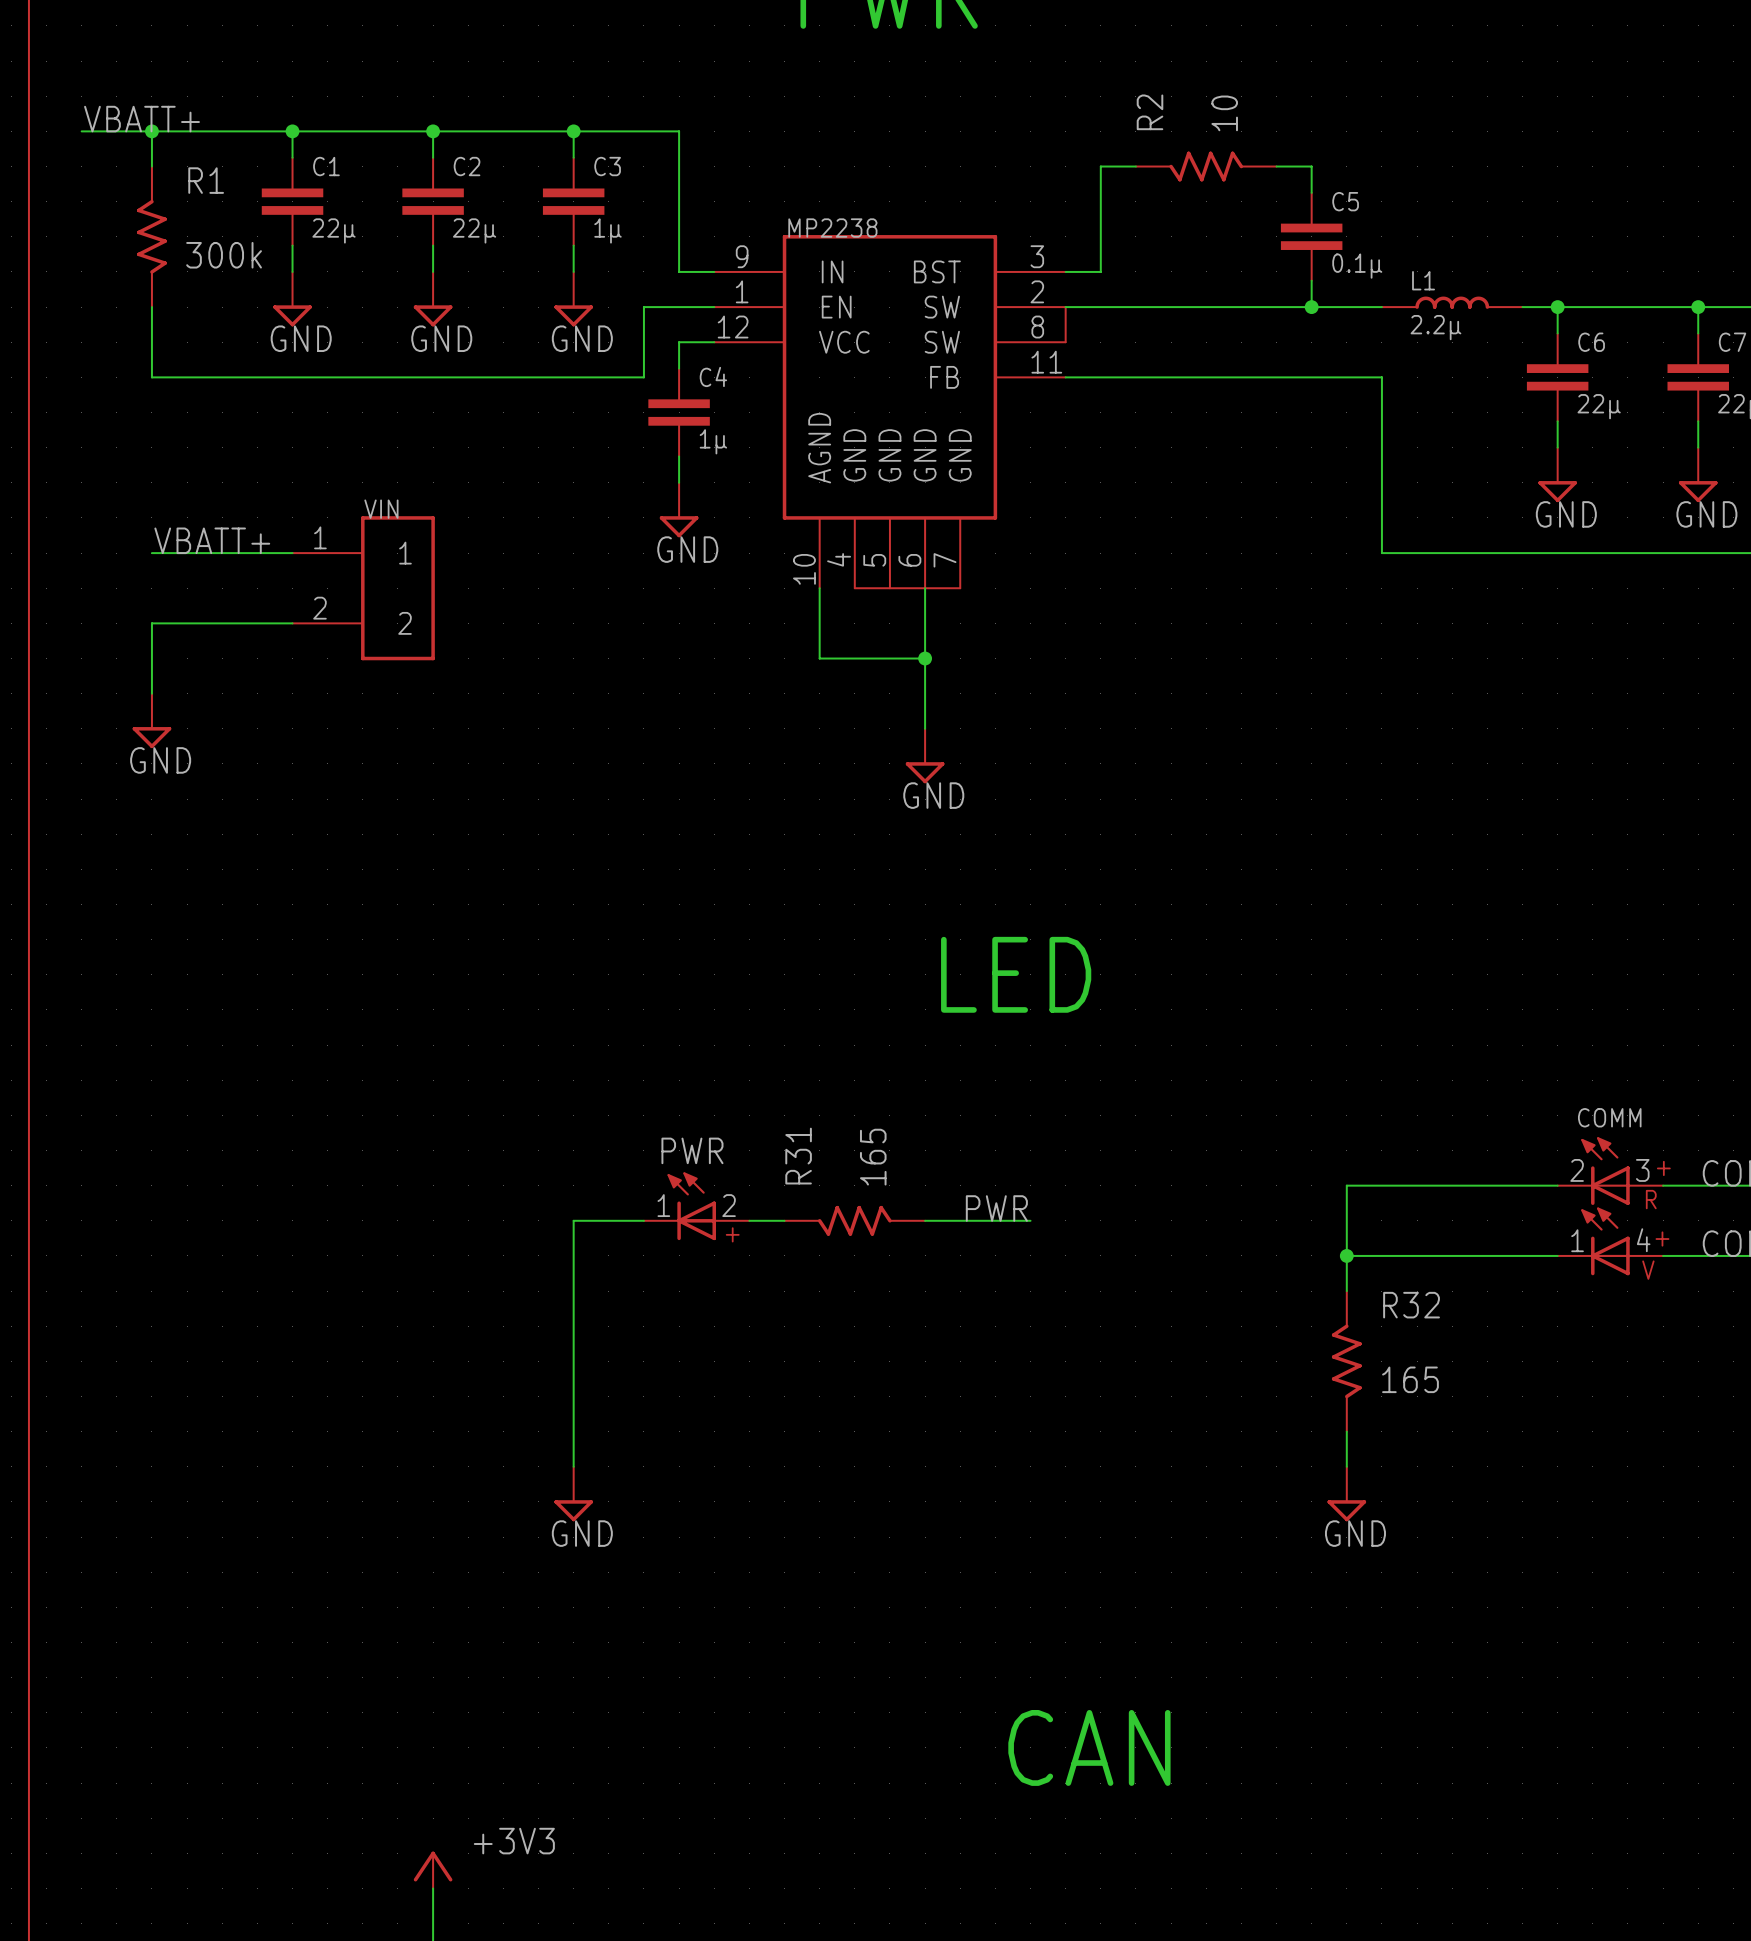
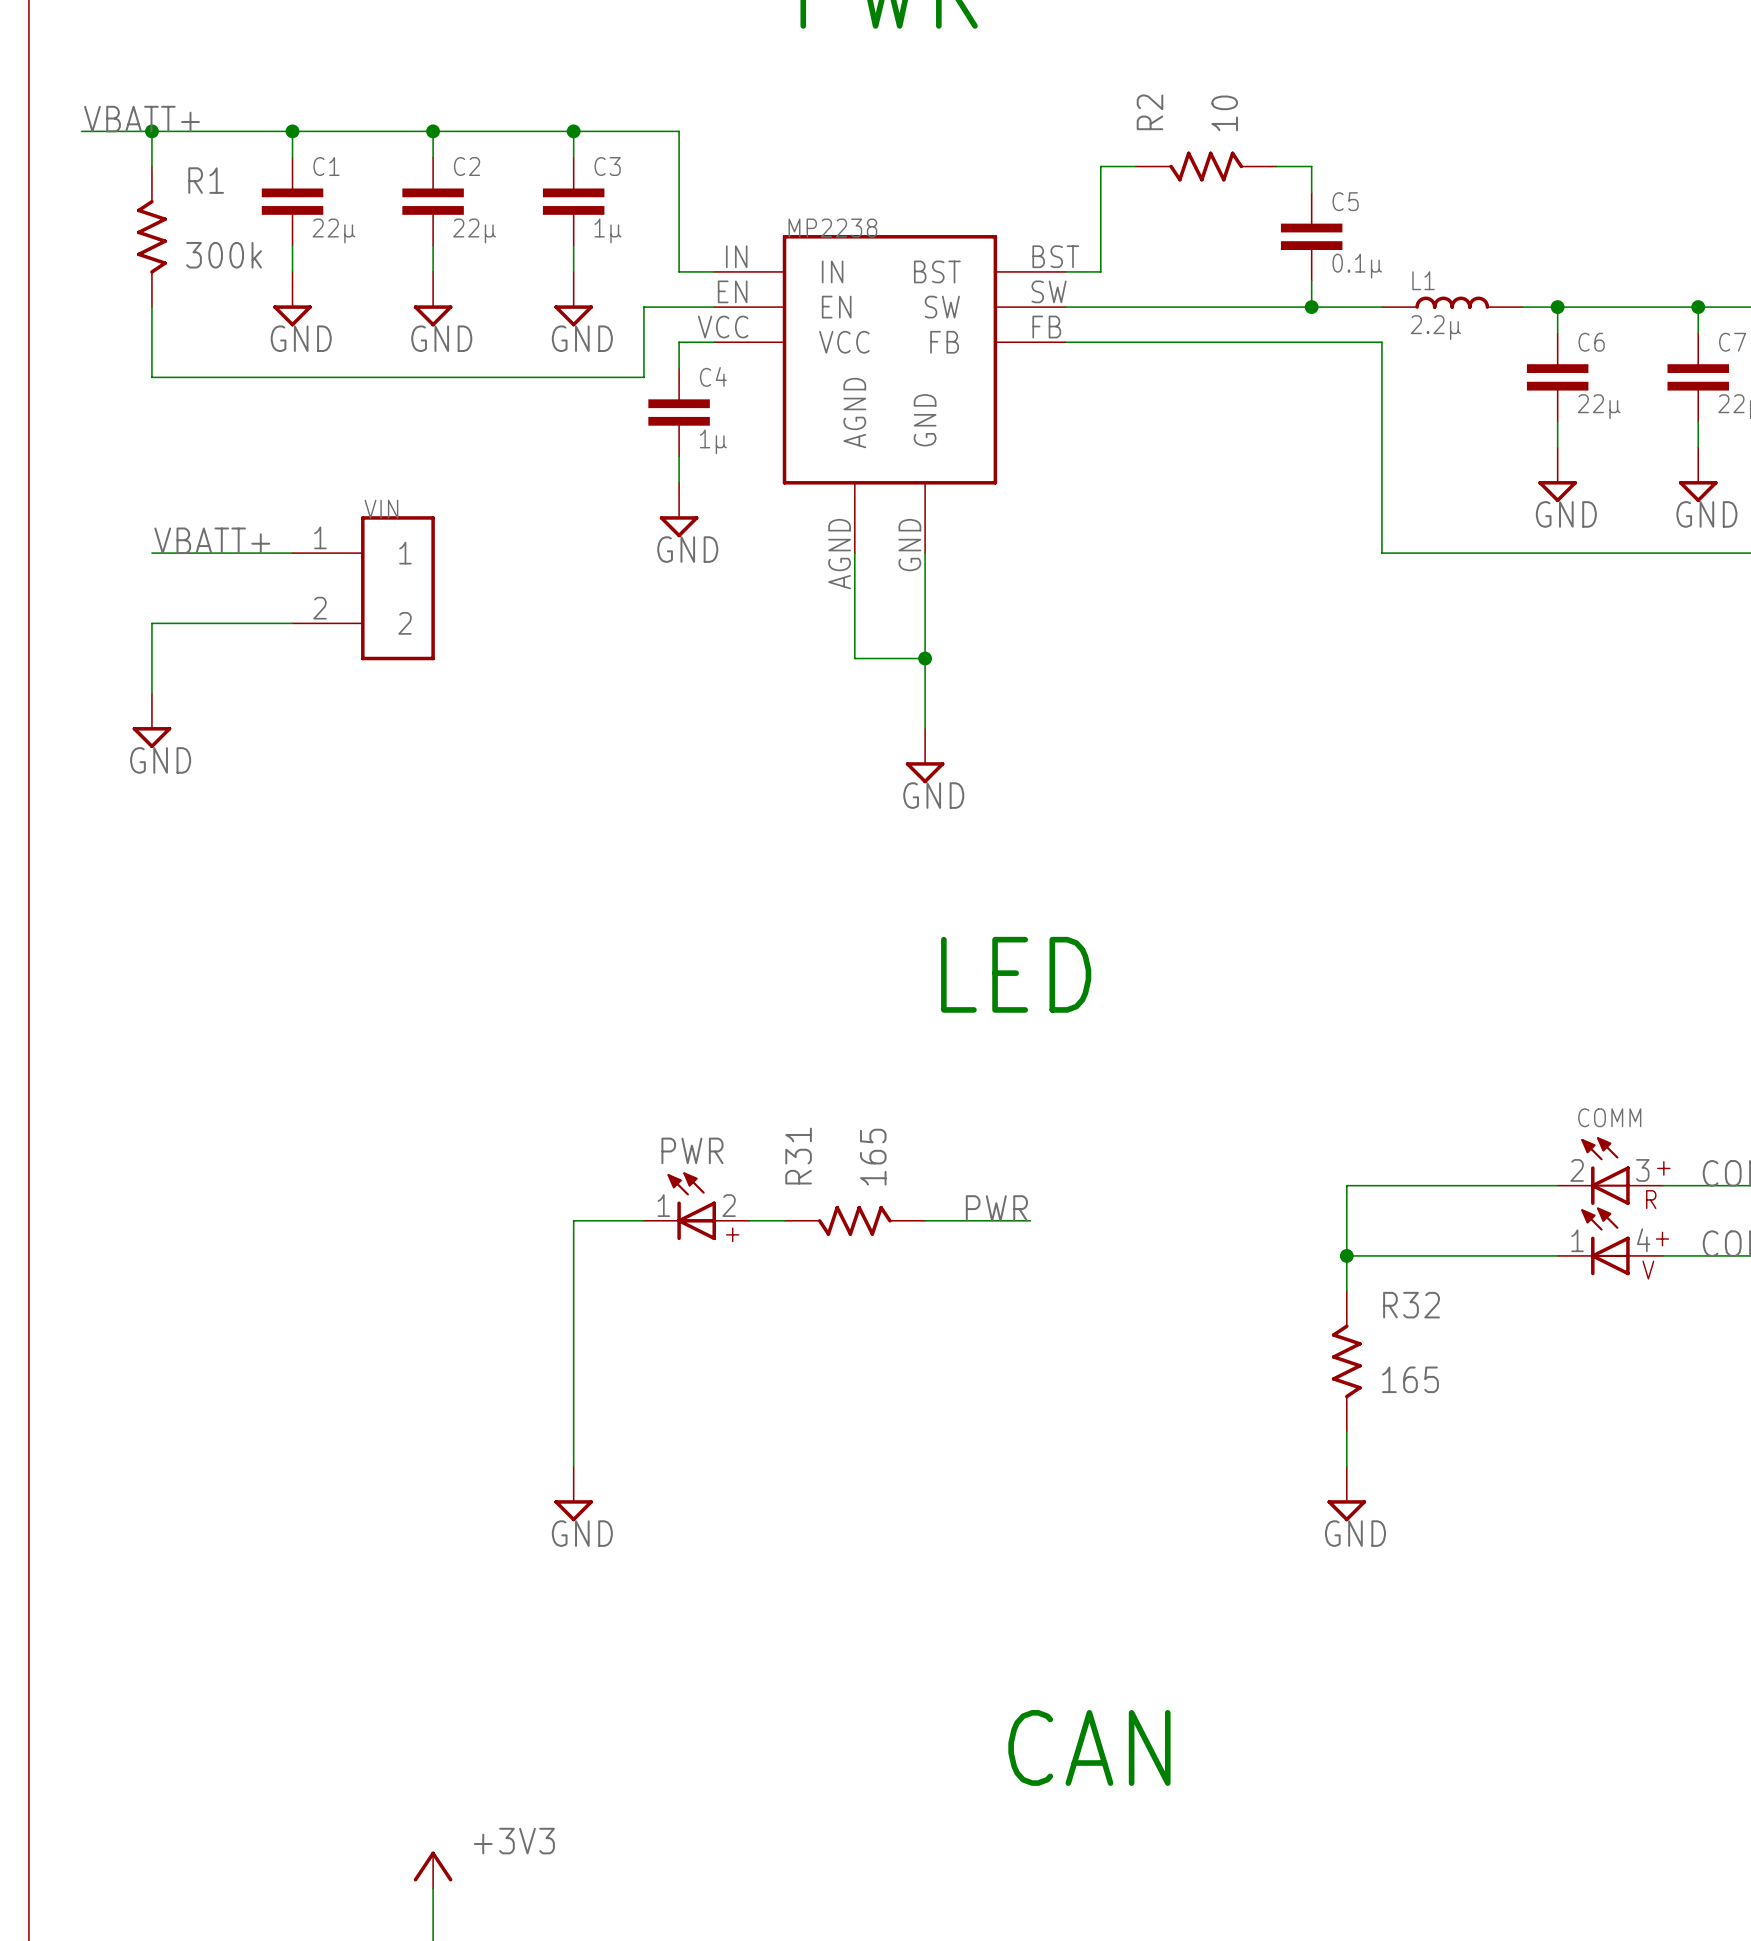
MP2238 symbol: [714, 235, 1067, 590] -> [714, 235, 1066, 554]
wire: (1065, 377) (1381, 377) -> (1065, 342) (1381, 342) (1381, 377)
wire: (819, 588) (819, 658) (854, 658) -> (854, 553) (854, 658)

